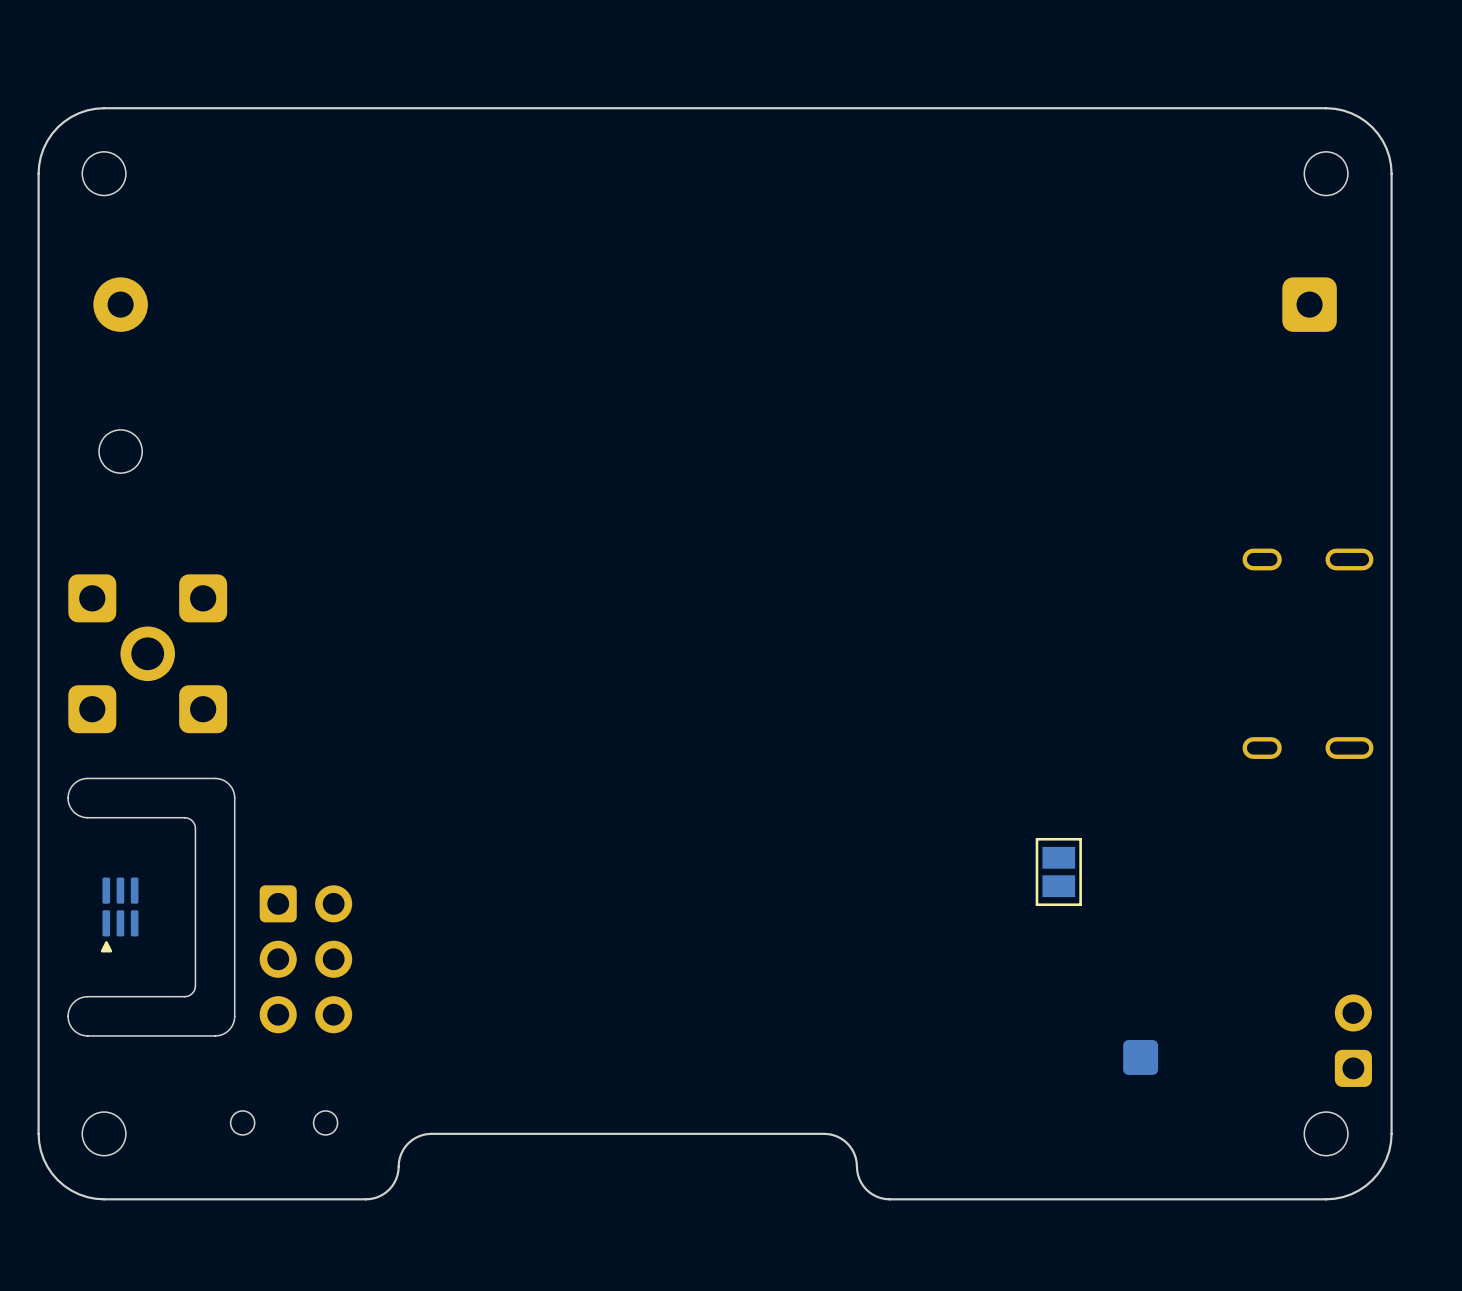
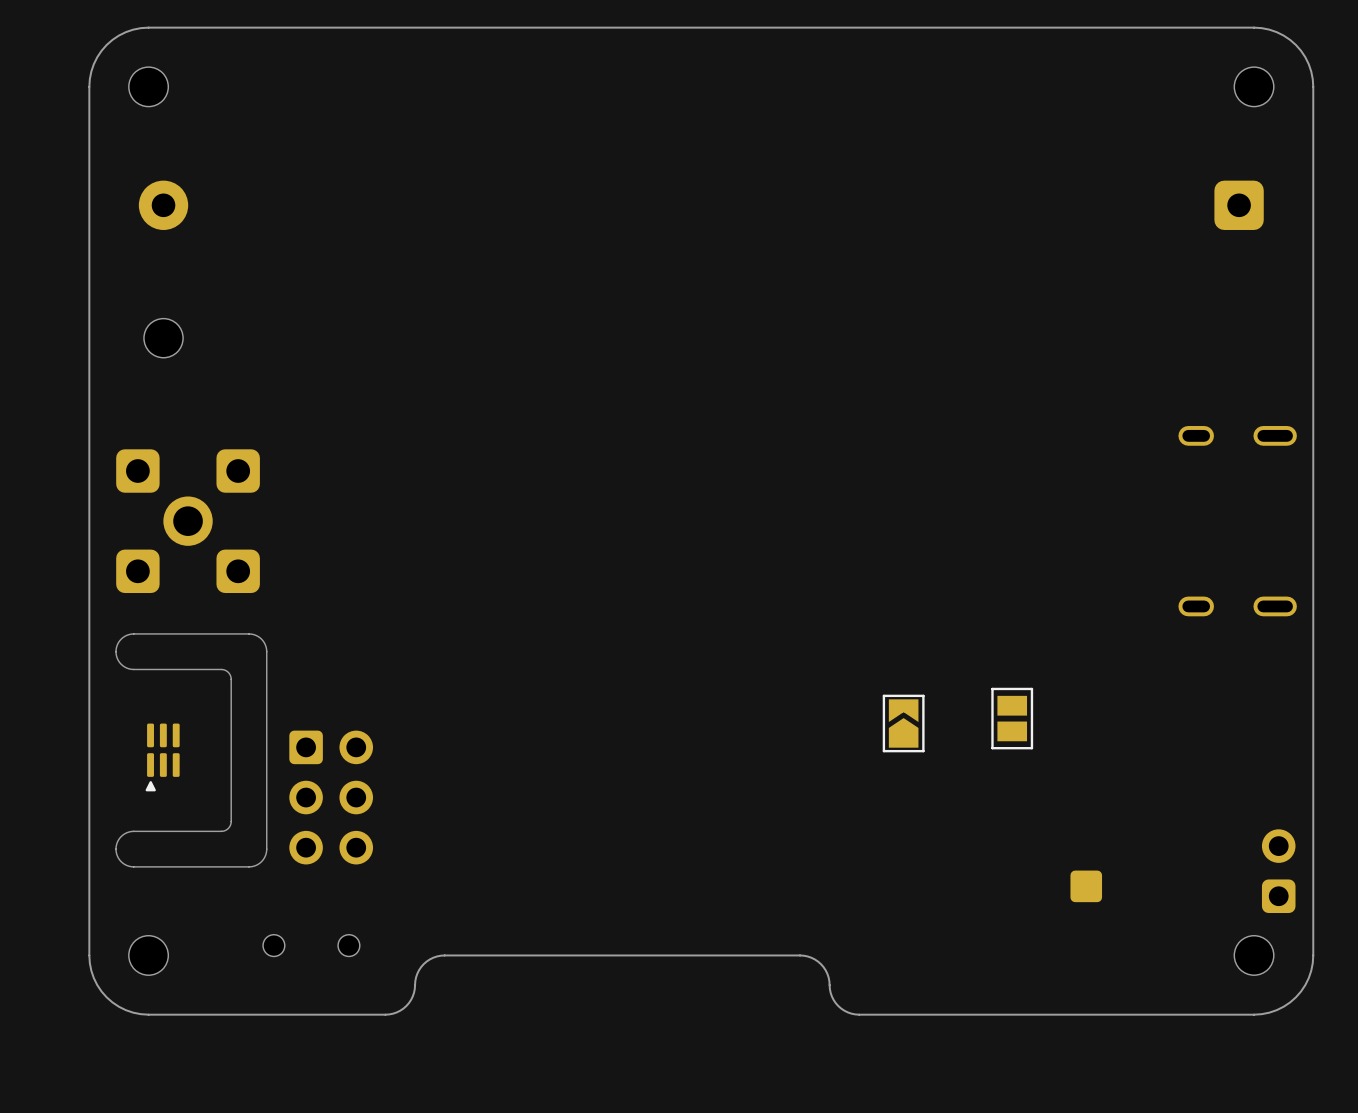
part: none -> (903, 723)

